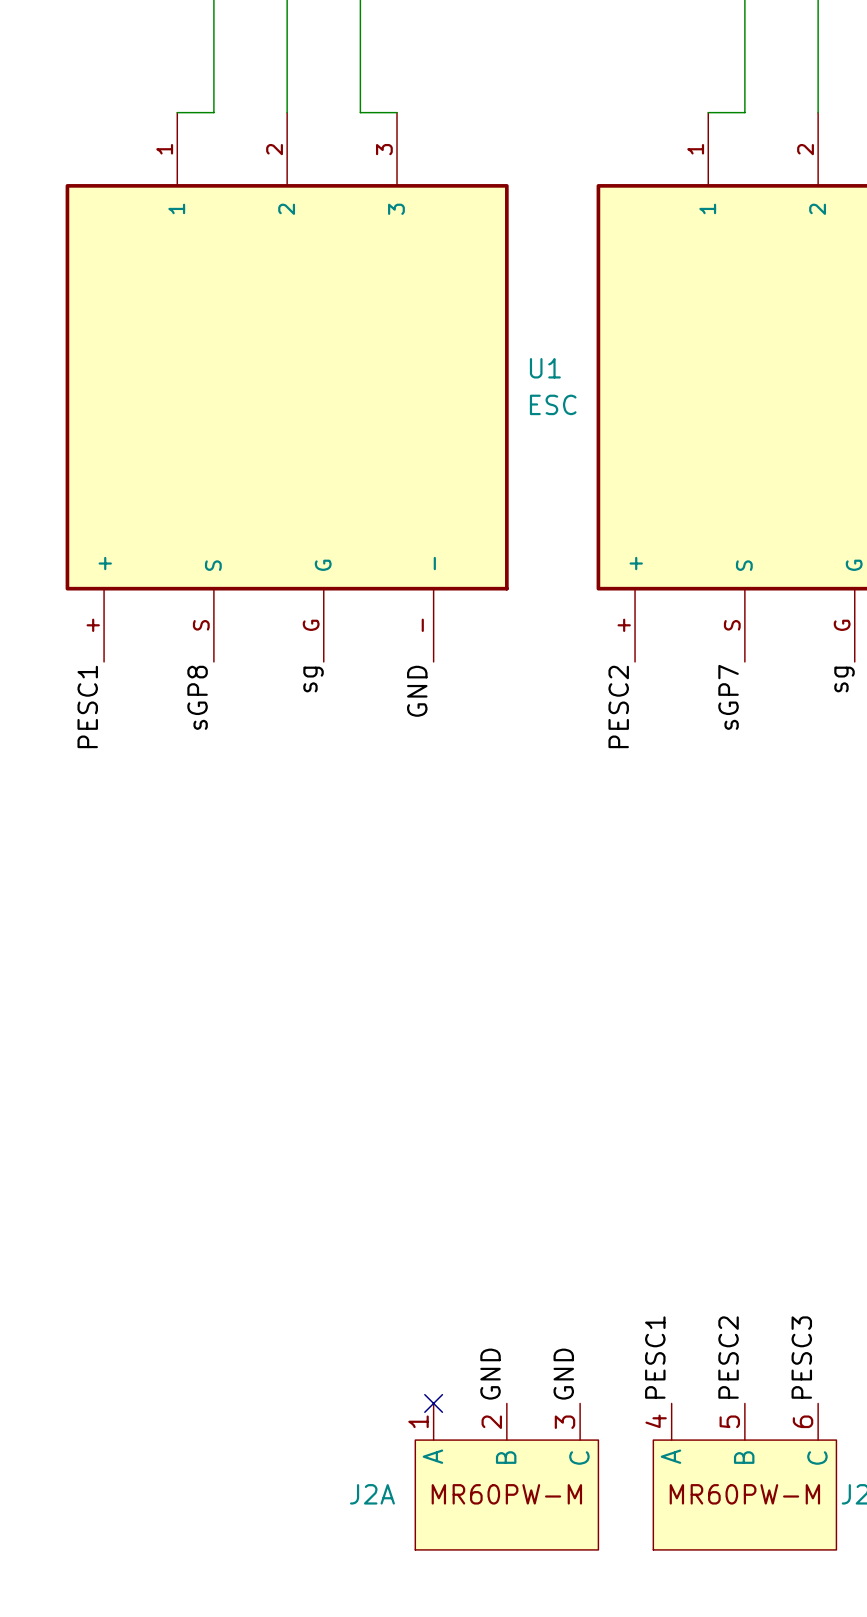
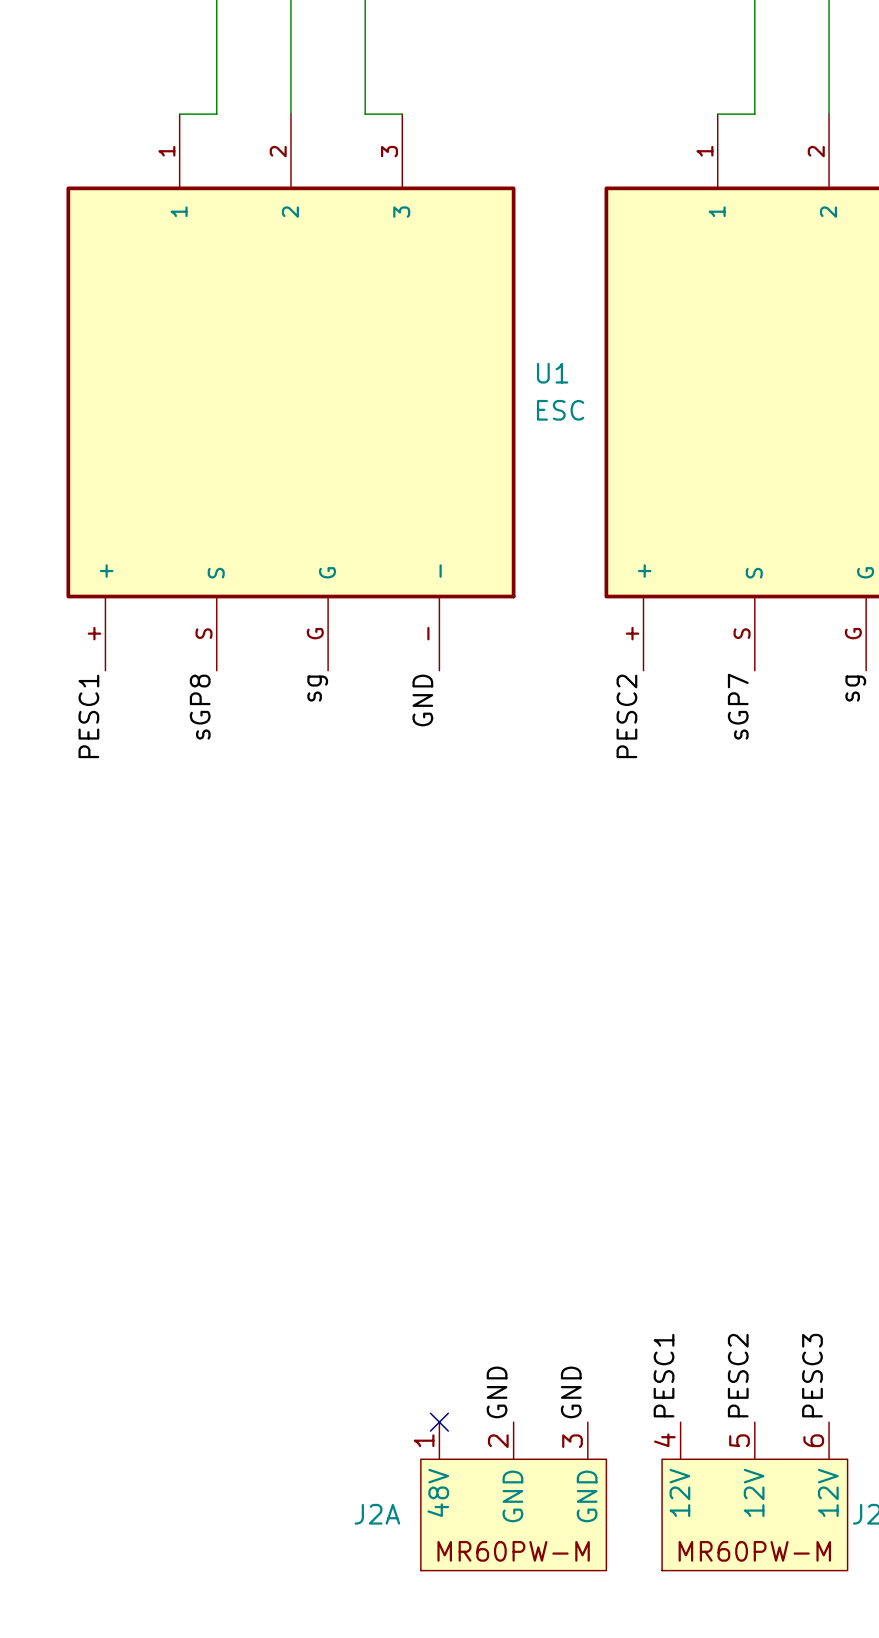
J2A pin name: A (432, 1456) -> 48V (438, 1492)
part pin name: A (670, 1456) -> 12V (679, 1492)
J2A pin name: B (506, 1457) -> GND (512, 1496)
part pin name: B (744, 1457) -> 12V (754, 1492)
J2A pin name: C (579, 1458) -> GND (587, 1496)
part pin name: C (817, 1458) -> 12V (828, 1492)
J2A text position: MR60PW-M (506, 1494) -> MR60PW-M (513, 1551)
part text position: MR60PW-M (744, 1494) -> MR60PW-M (754, 1551)

